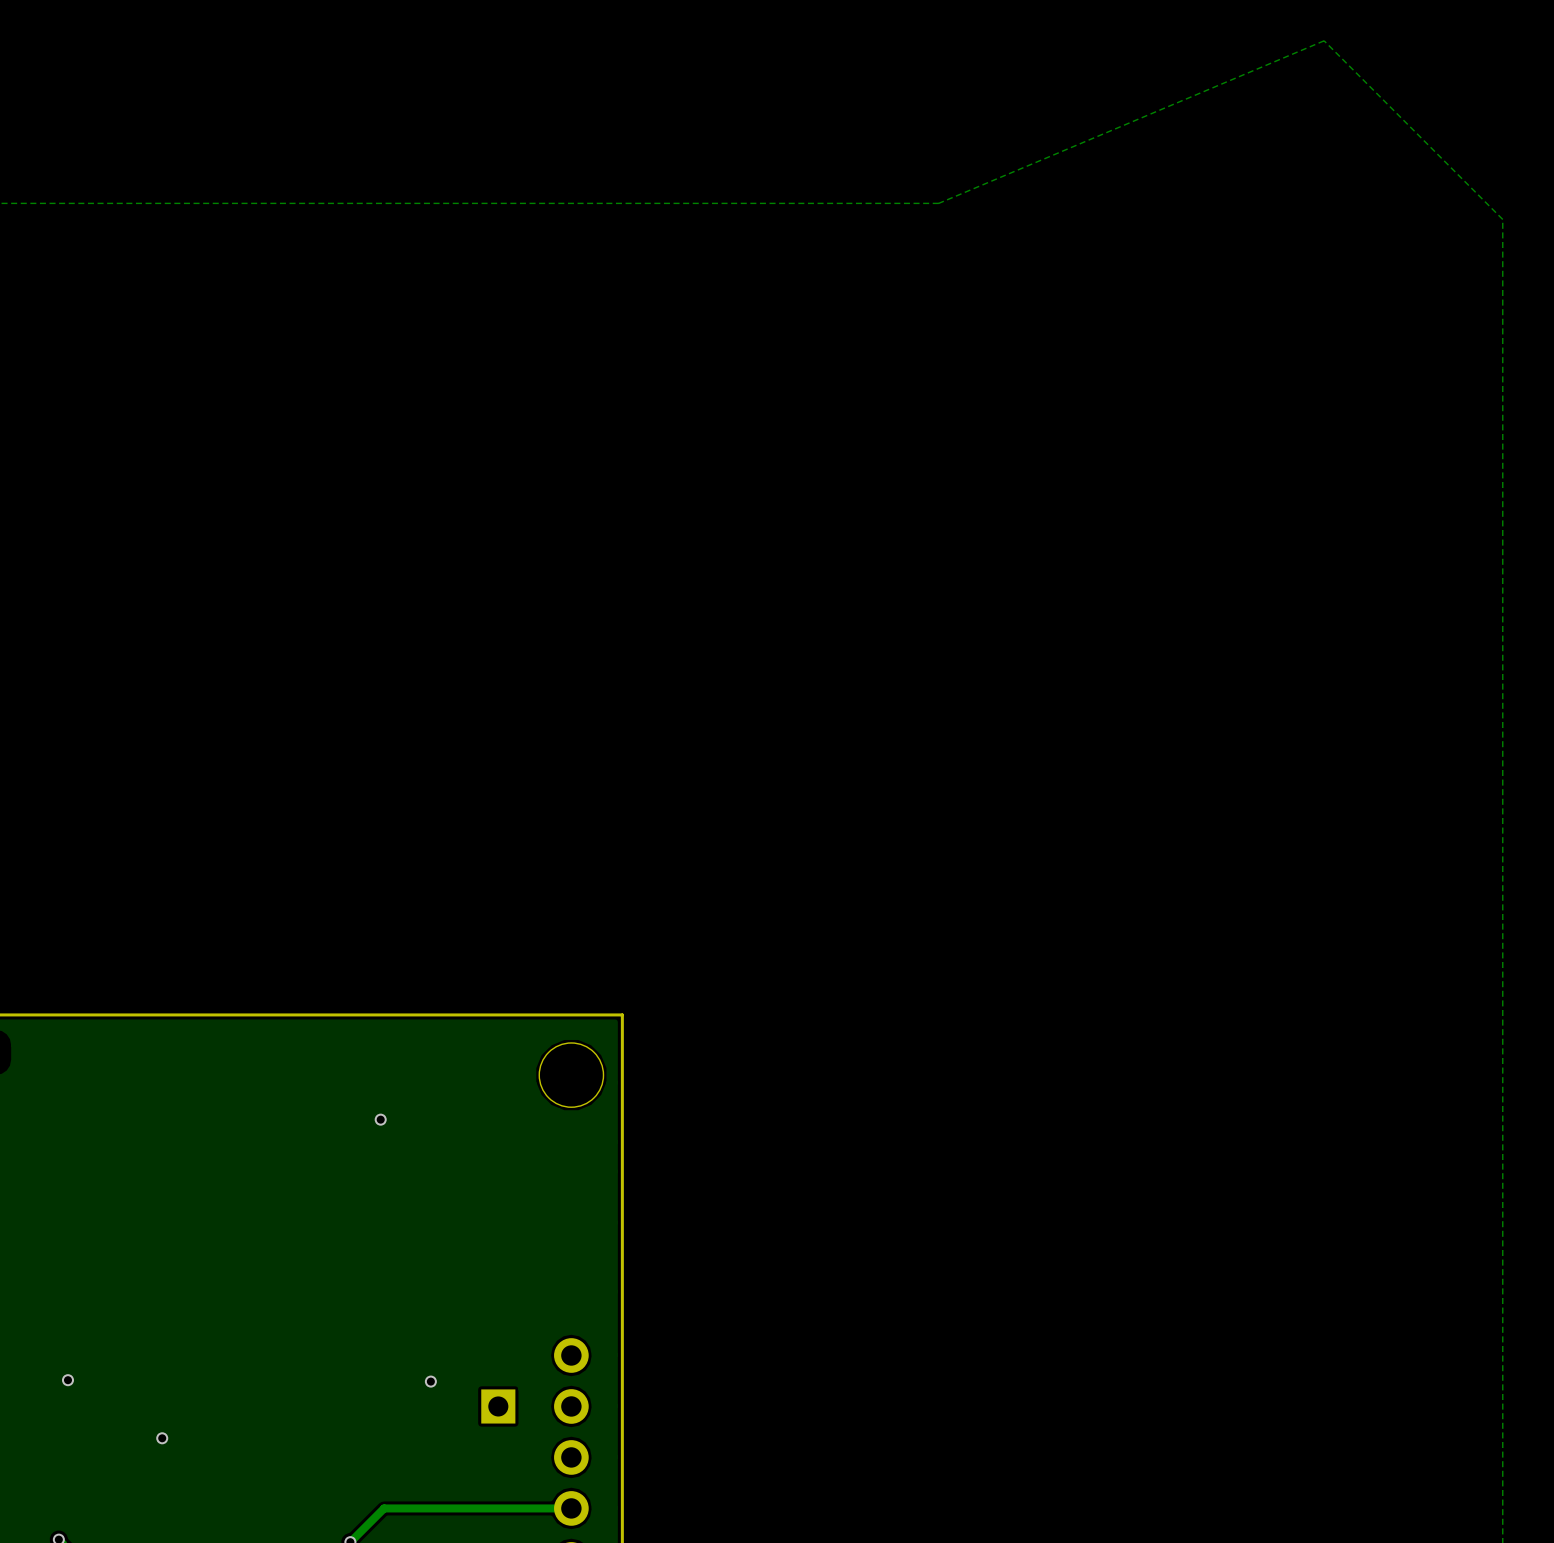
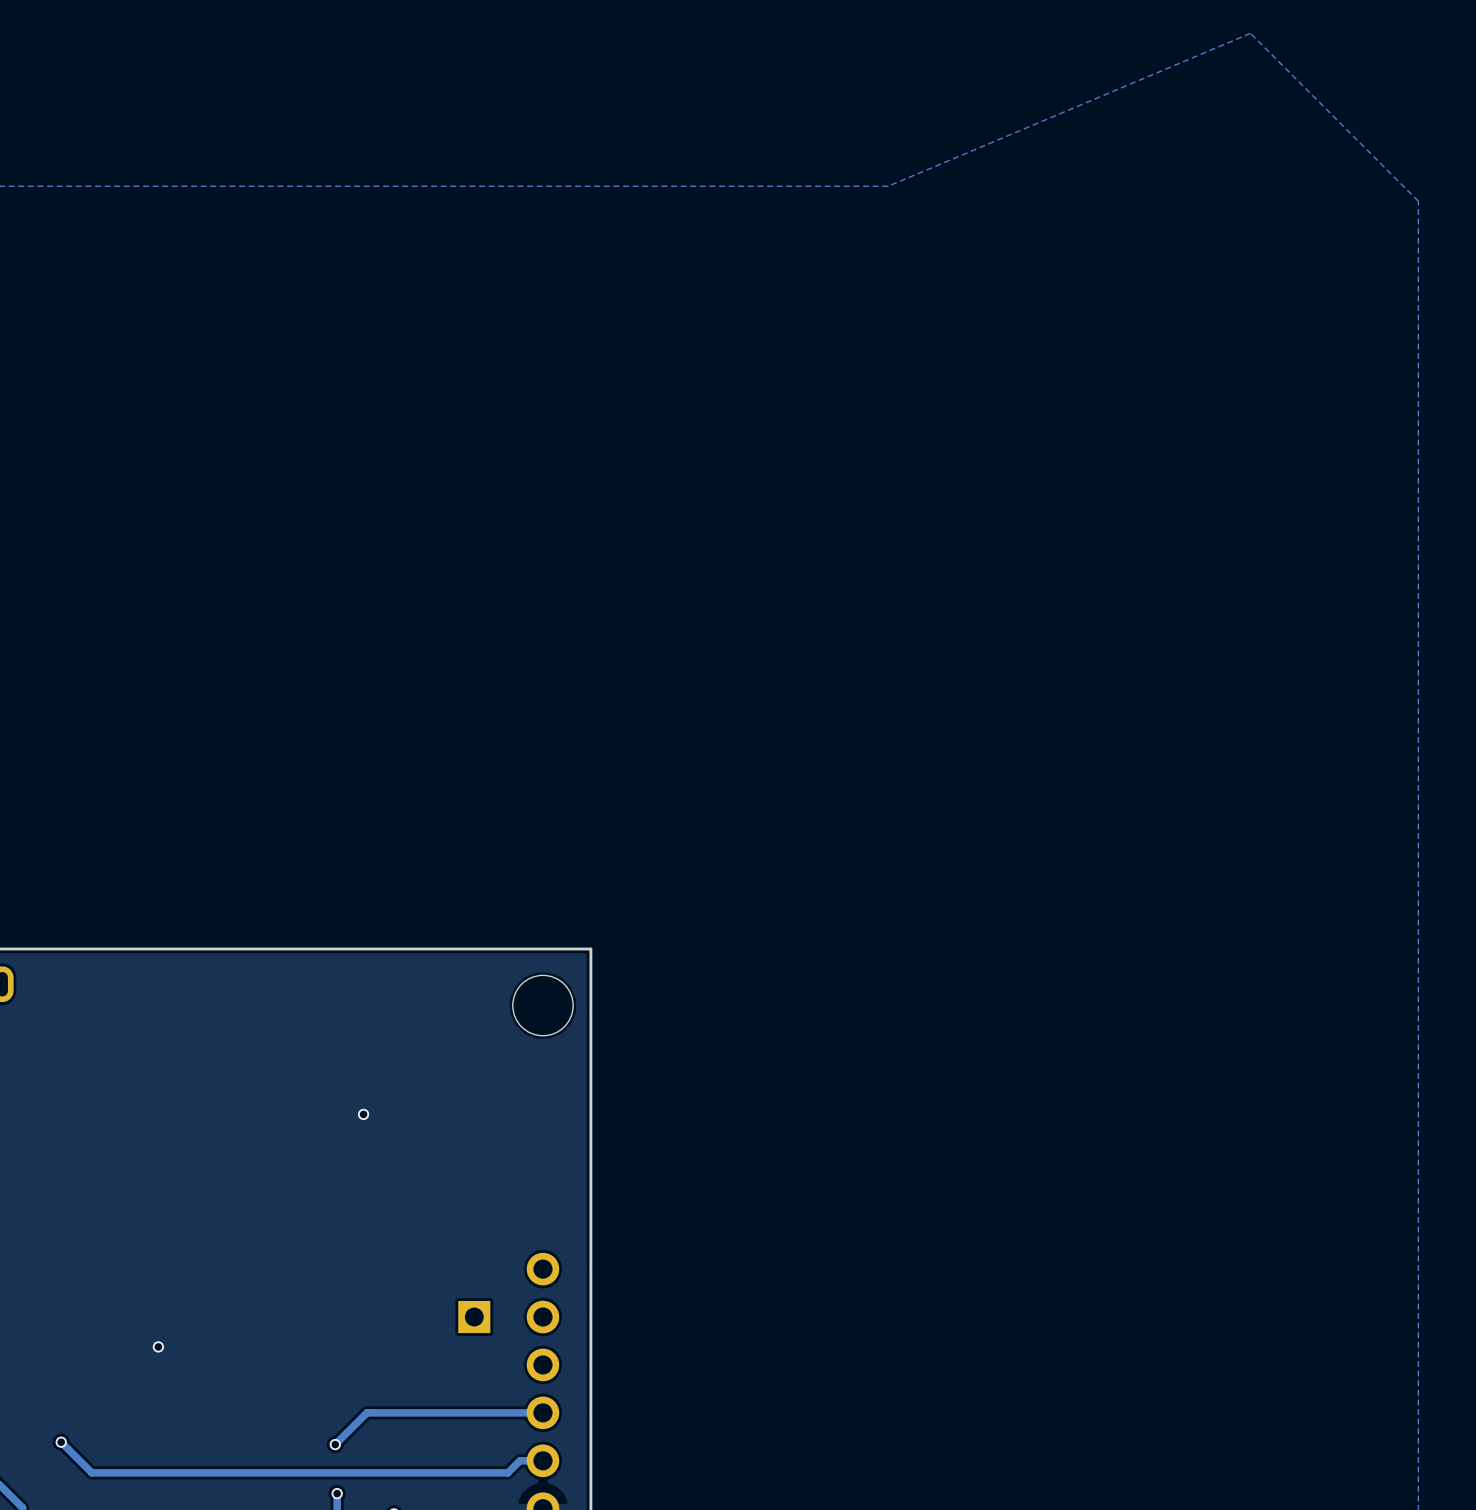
via position: (380, 1119) -> (363, 1114)
via: (67, 1380) -> none
via: (430, 1381) -> none

